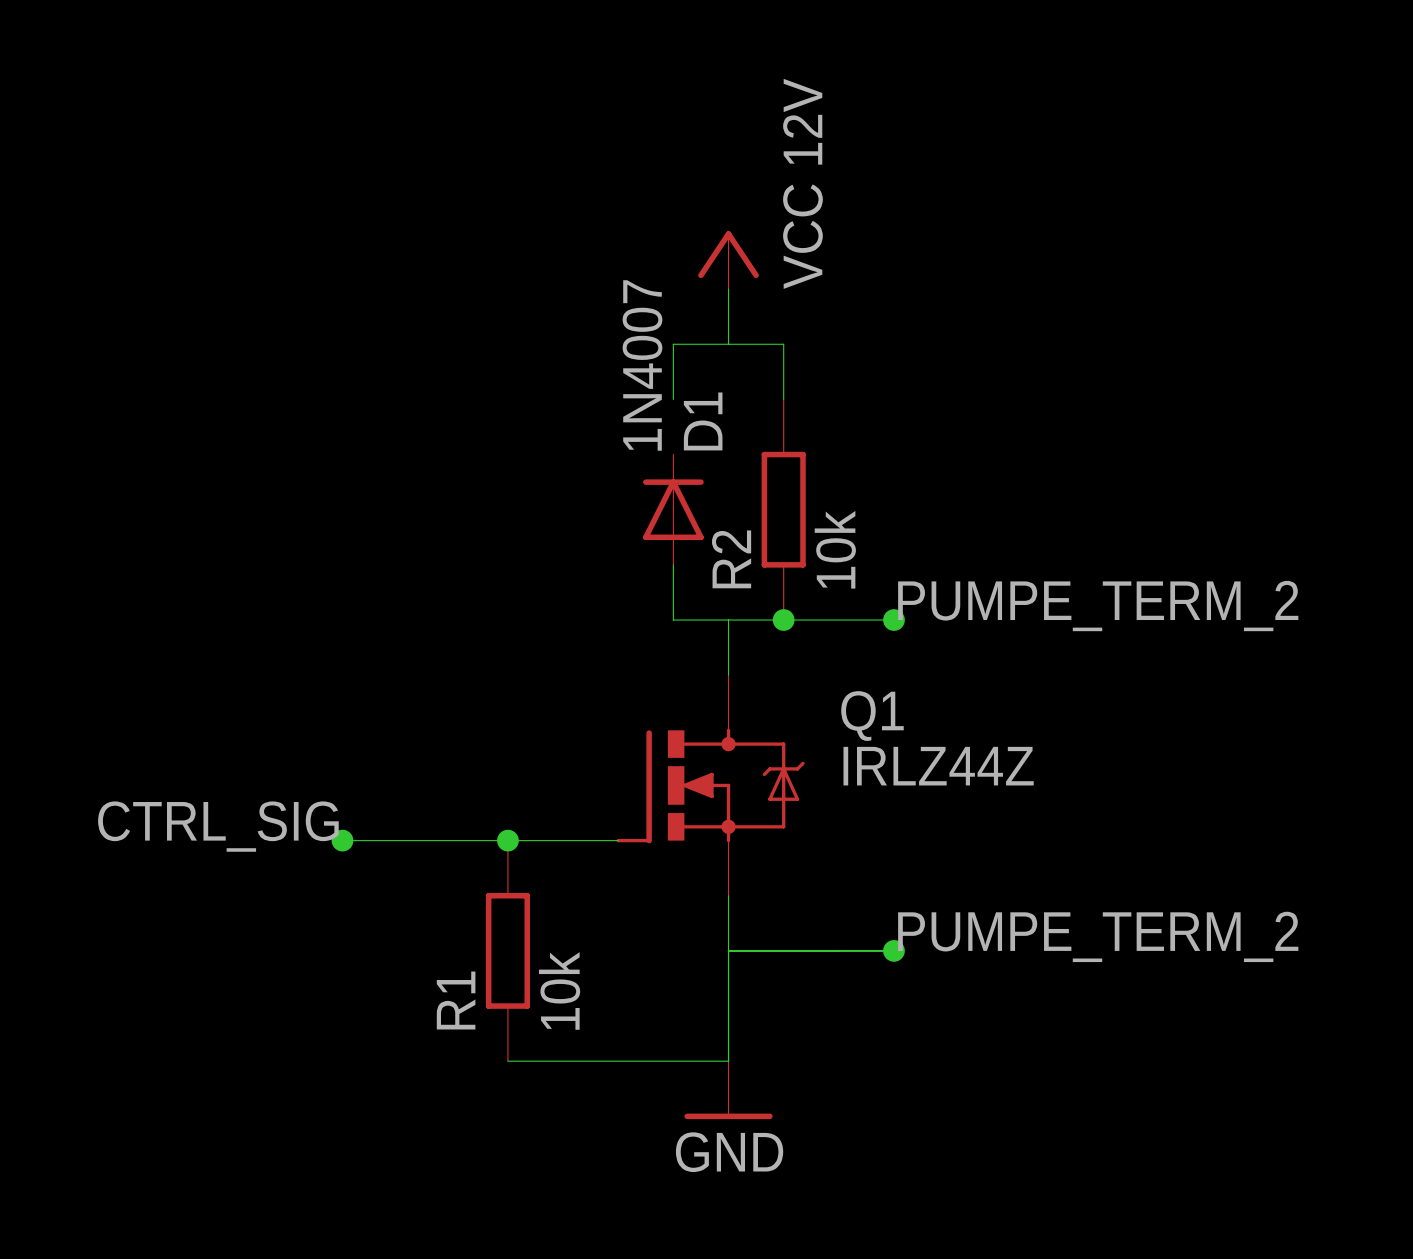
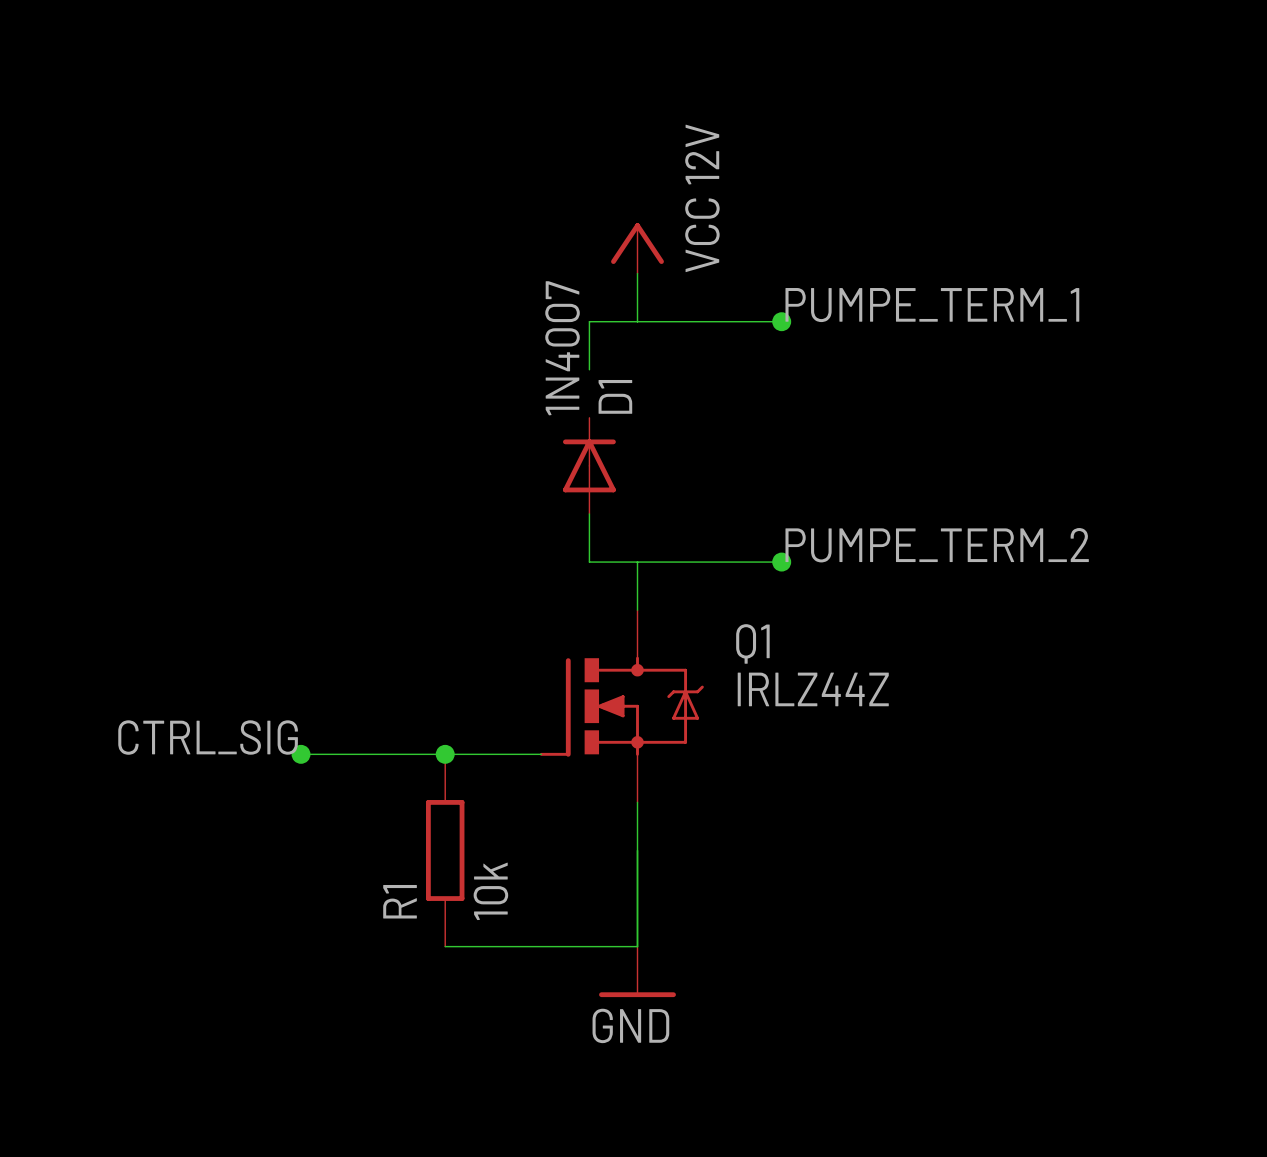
label: none -> PUMPE_TERM_1 (932, 305)
wire: (783, 344) (783, 399) -> (685, 321) (781, 321)
junction: none -> (781, 321)
R2: 10k (783, 509) -> none
junction: (783, 620) -> none
label: PUMPE_TERM_2 (1098, 936) -> none
wire: (728, 950) (893, 950) -> none
junction: (893, 950) -> none

